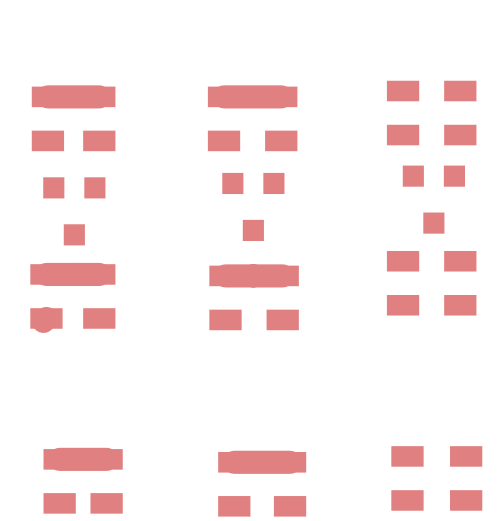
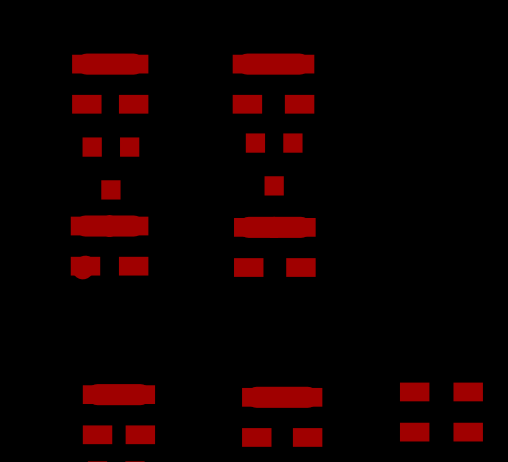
part: (403, 113) -> none
part: (460, 113) -> none
part: (433, 199) -> none
part: (403, 283) -> none
part: (460, 283) -> none

